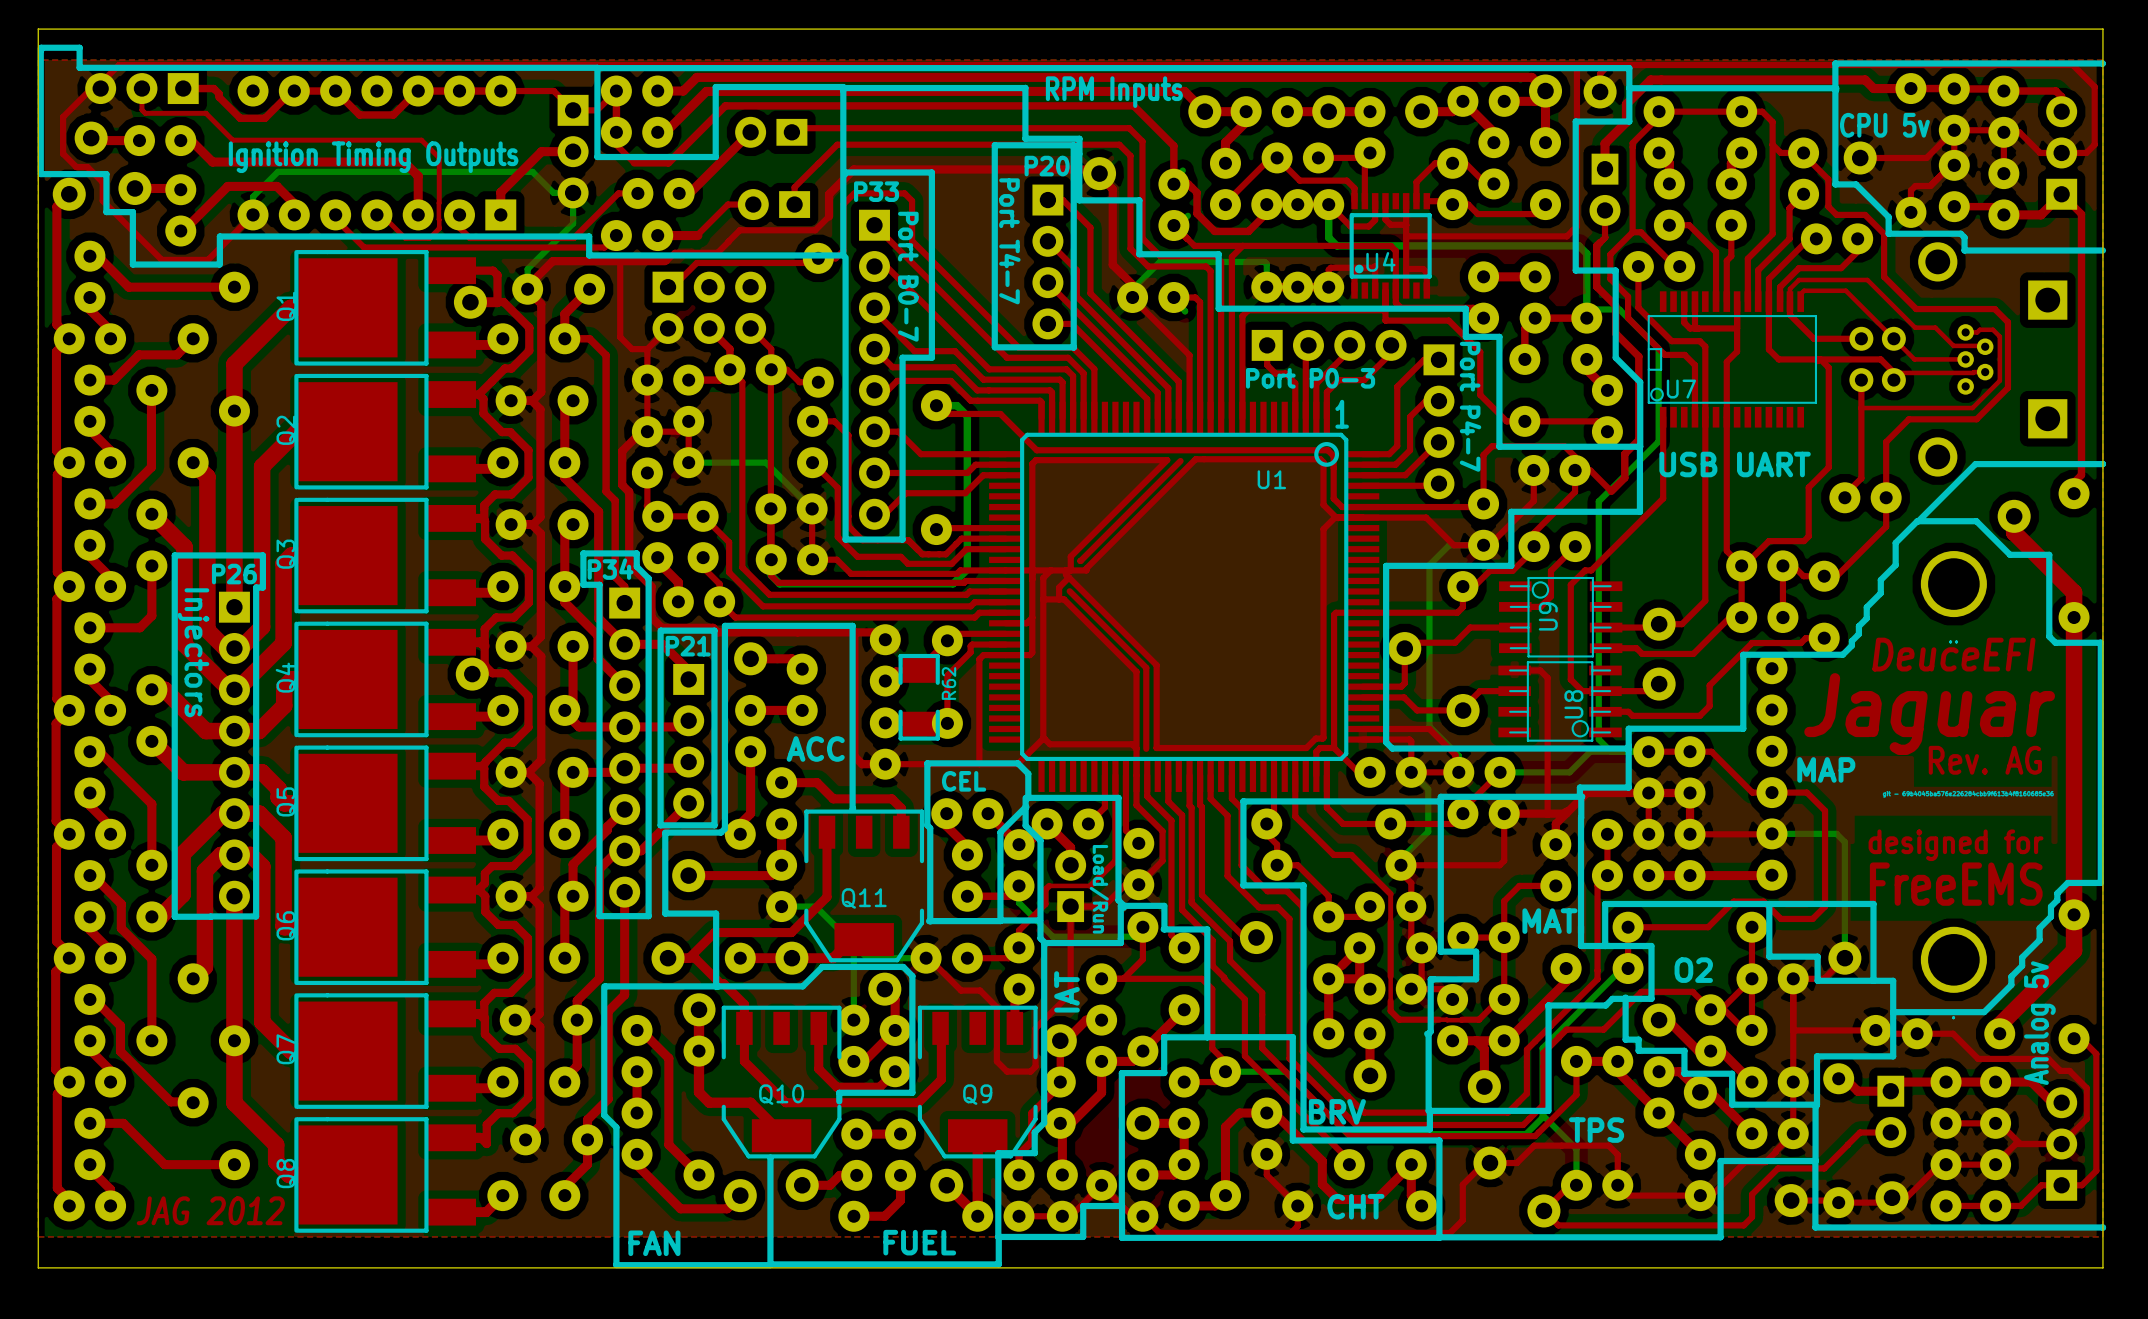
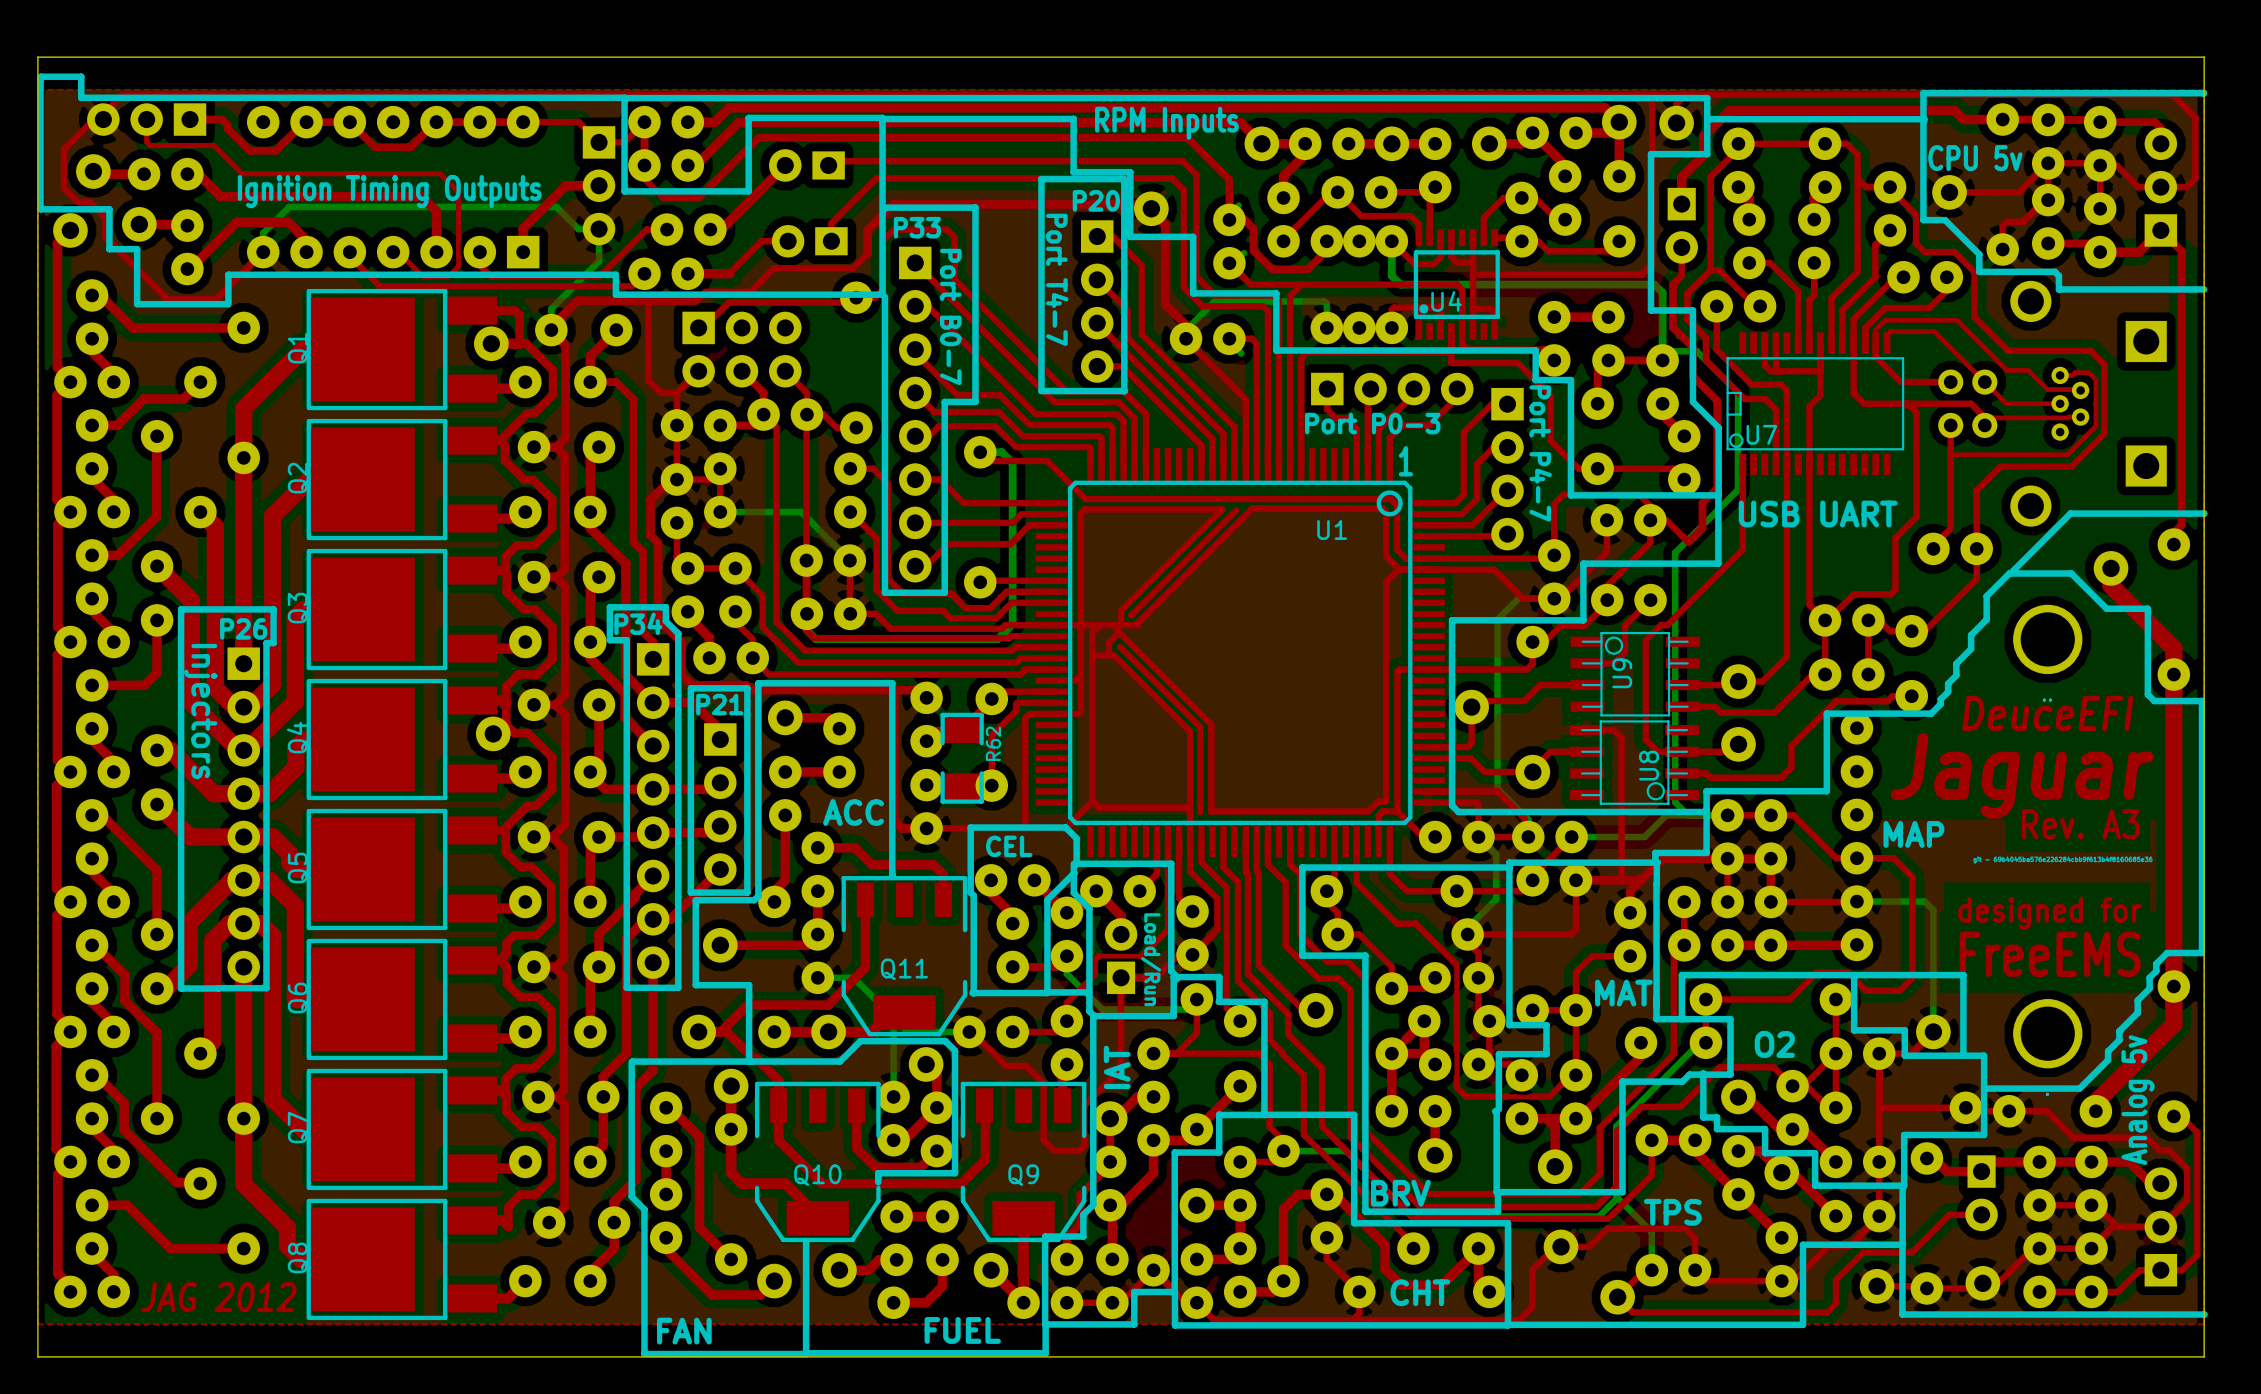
text: Rev. AG (1985, 760) -> Rev. A3 (2080, 824)

